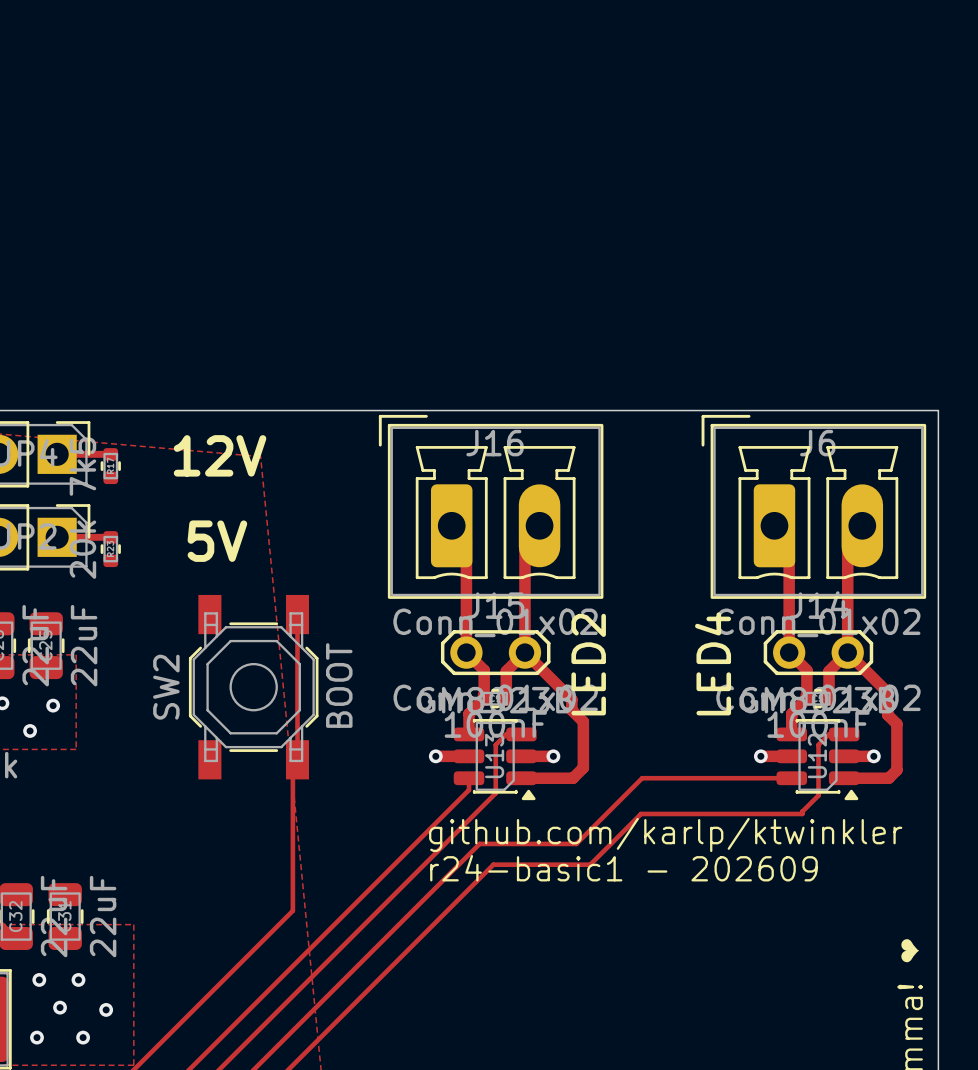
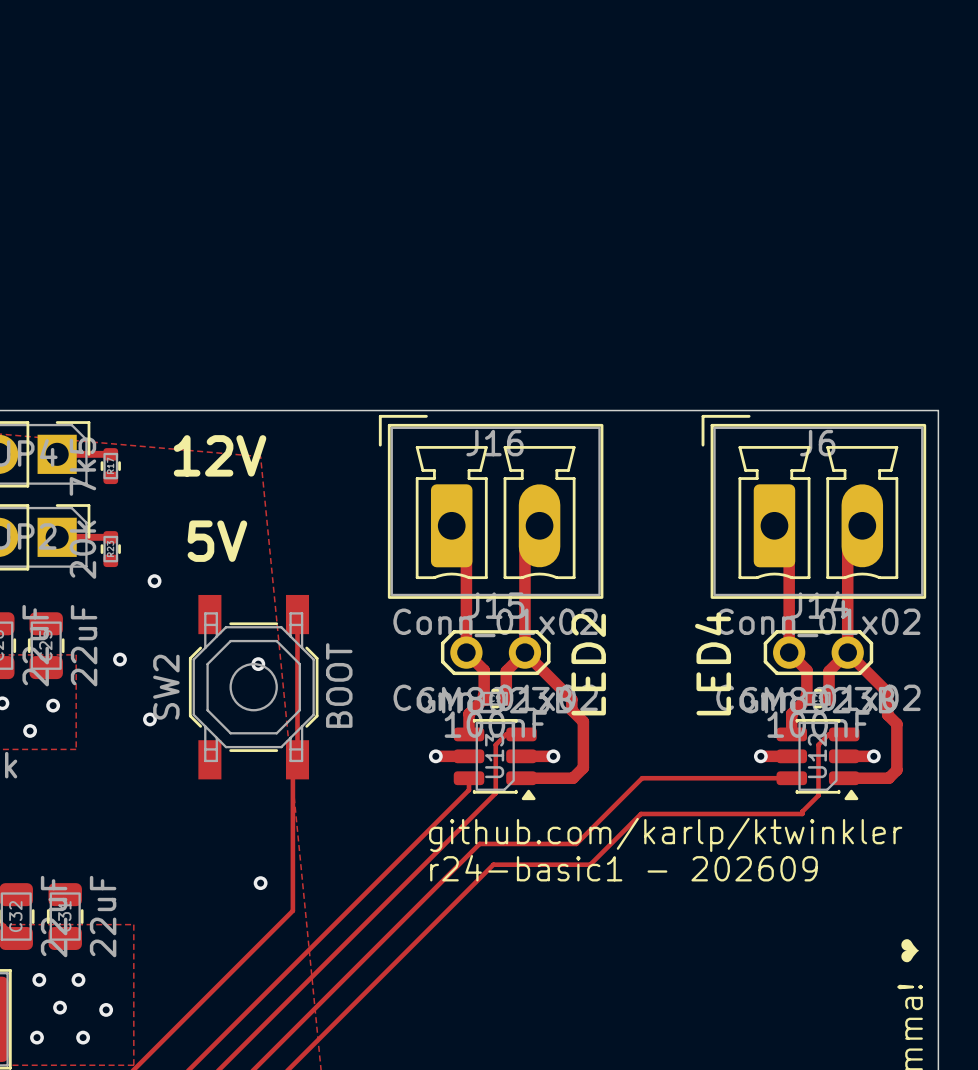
via: none -> (154, 581)
via: none -> (119, 659)
via: none -> (258, 664)
via: none -> (149, 719)
via: none -> (260, 883)

